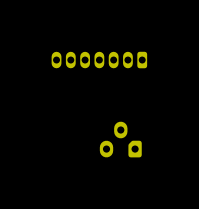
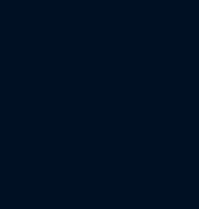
part: (99, 60) -> none
part: (120, 139) -> none

